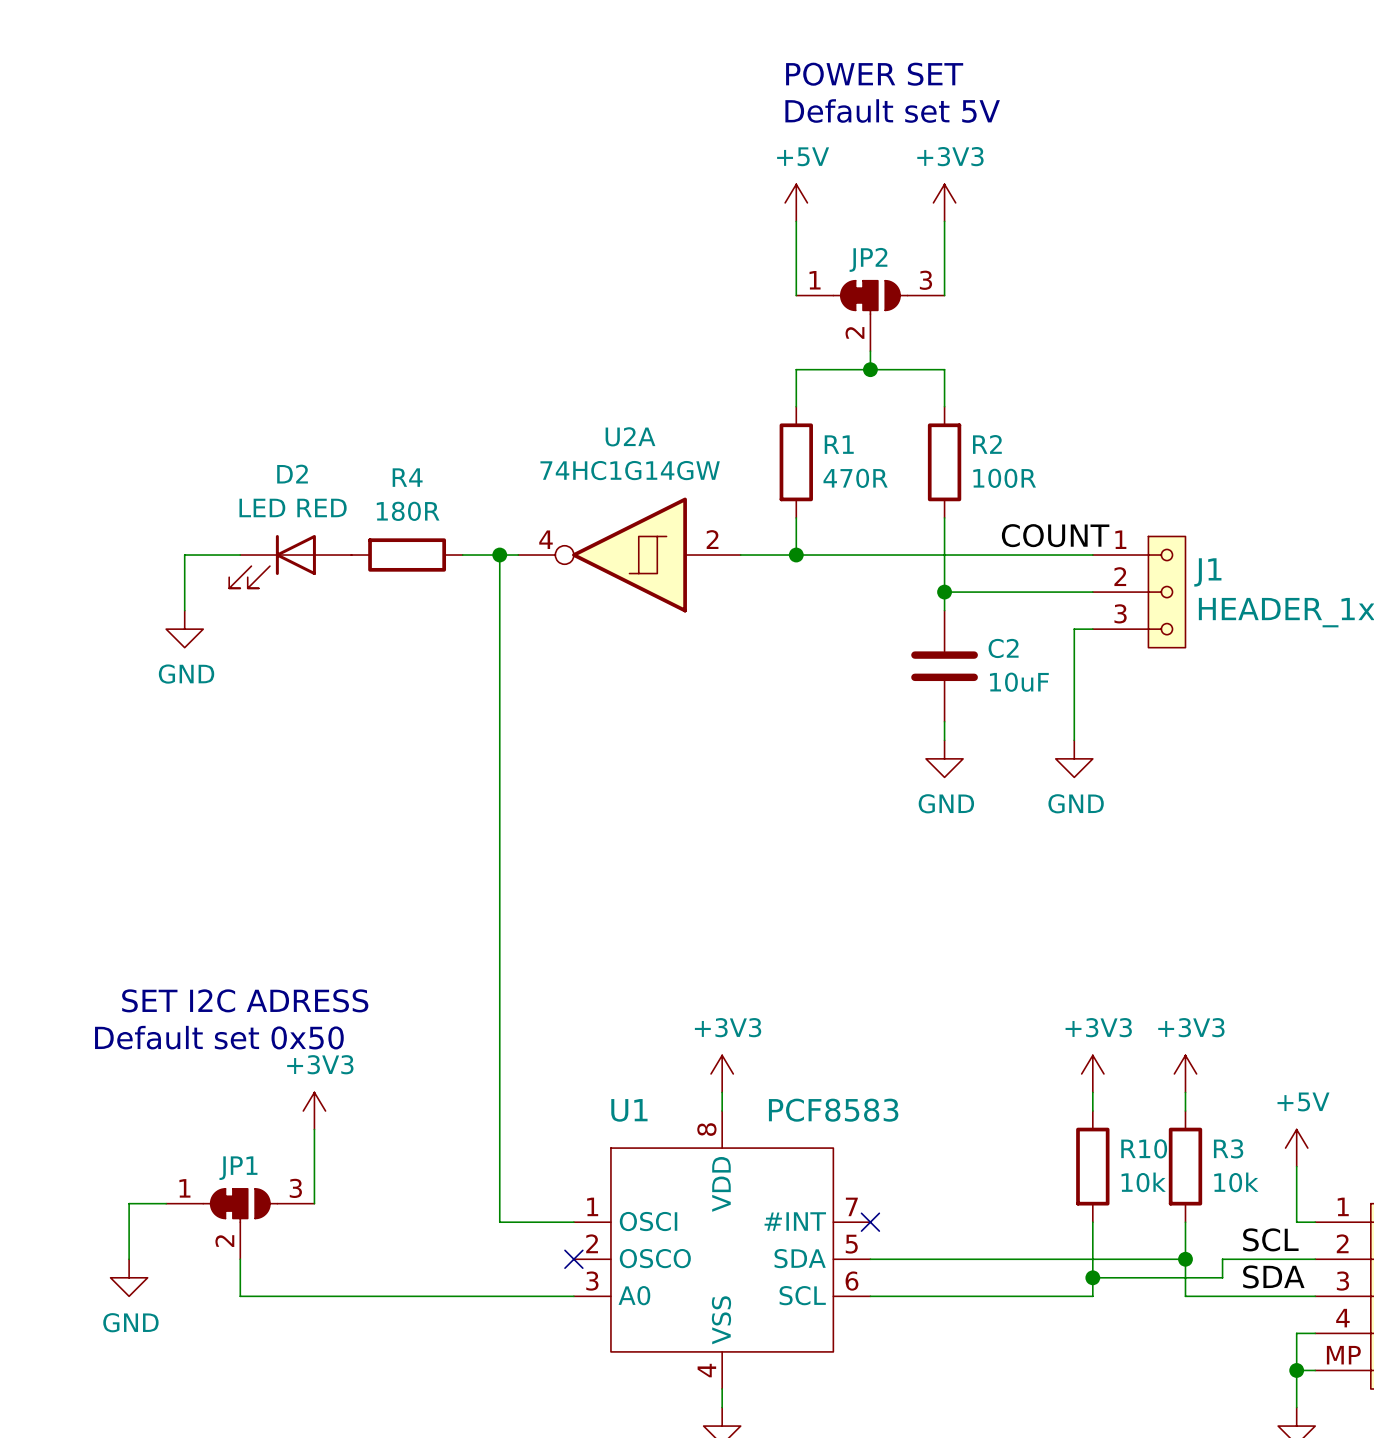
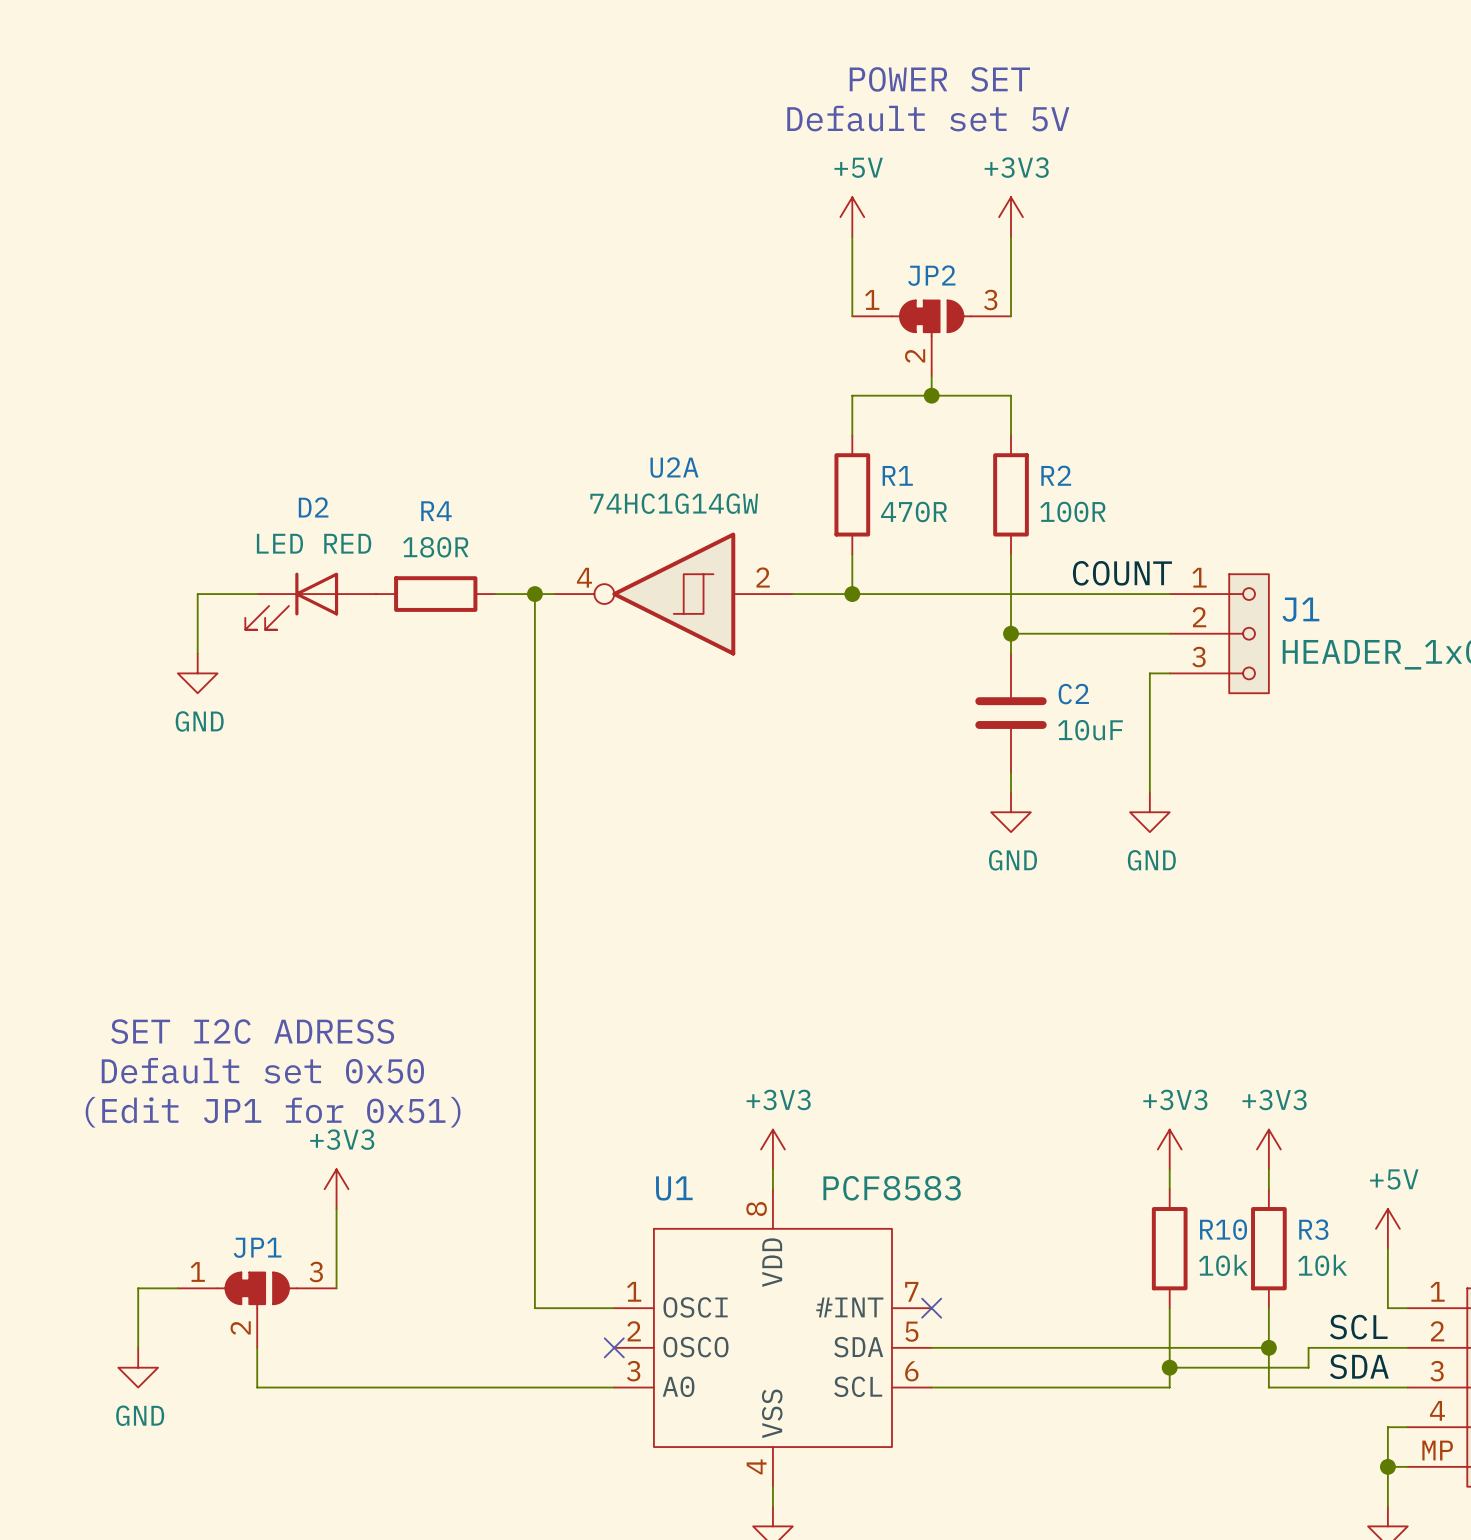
text position: SET I2C ADRESS (245, 1000) -> SET I2C ADRESS (252, 1031)
text position: Default set 0x50 (219, 1037) -> Default set 0x50 (262, 1070)
text: none -> (Edit JP1 for 0x51) (273, 1112)

